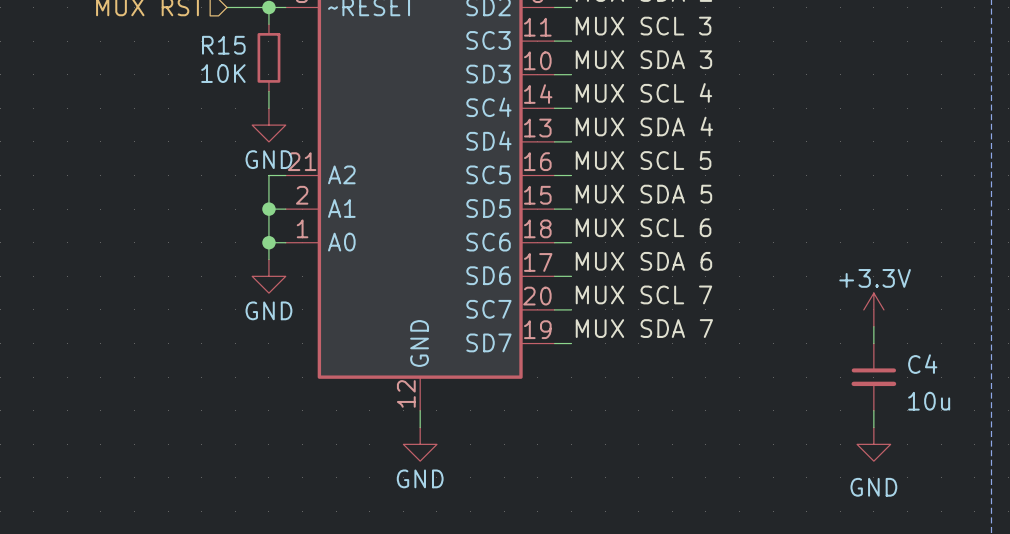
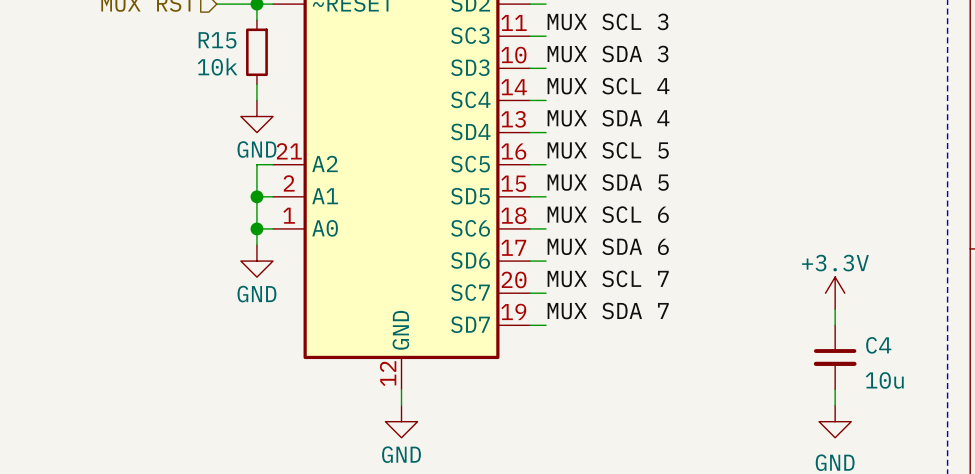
R15 value: 10K (223, 73) -> 10k (217, 66)

